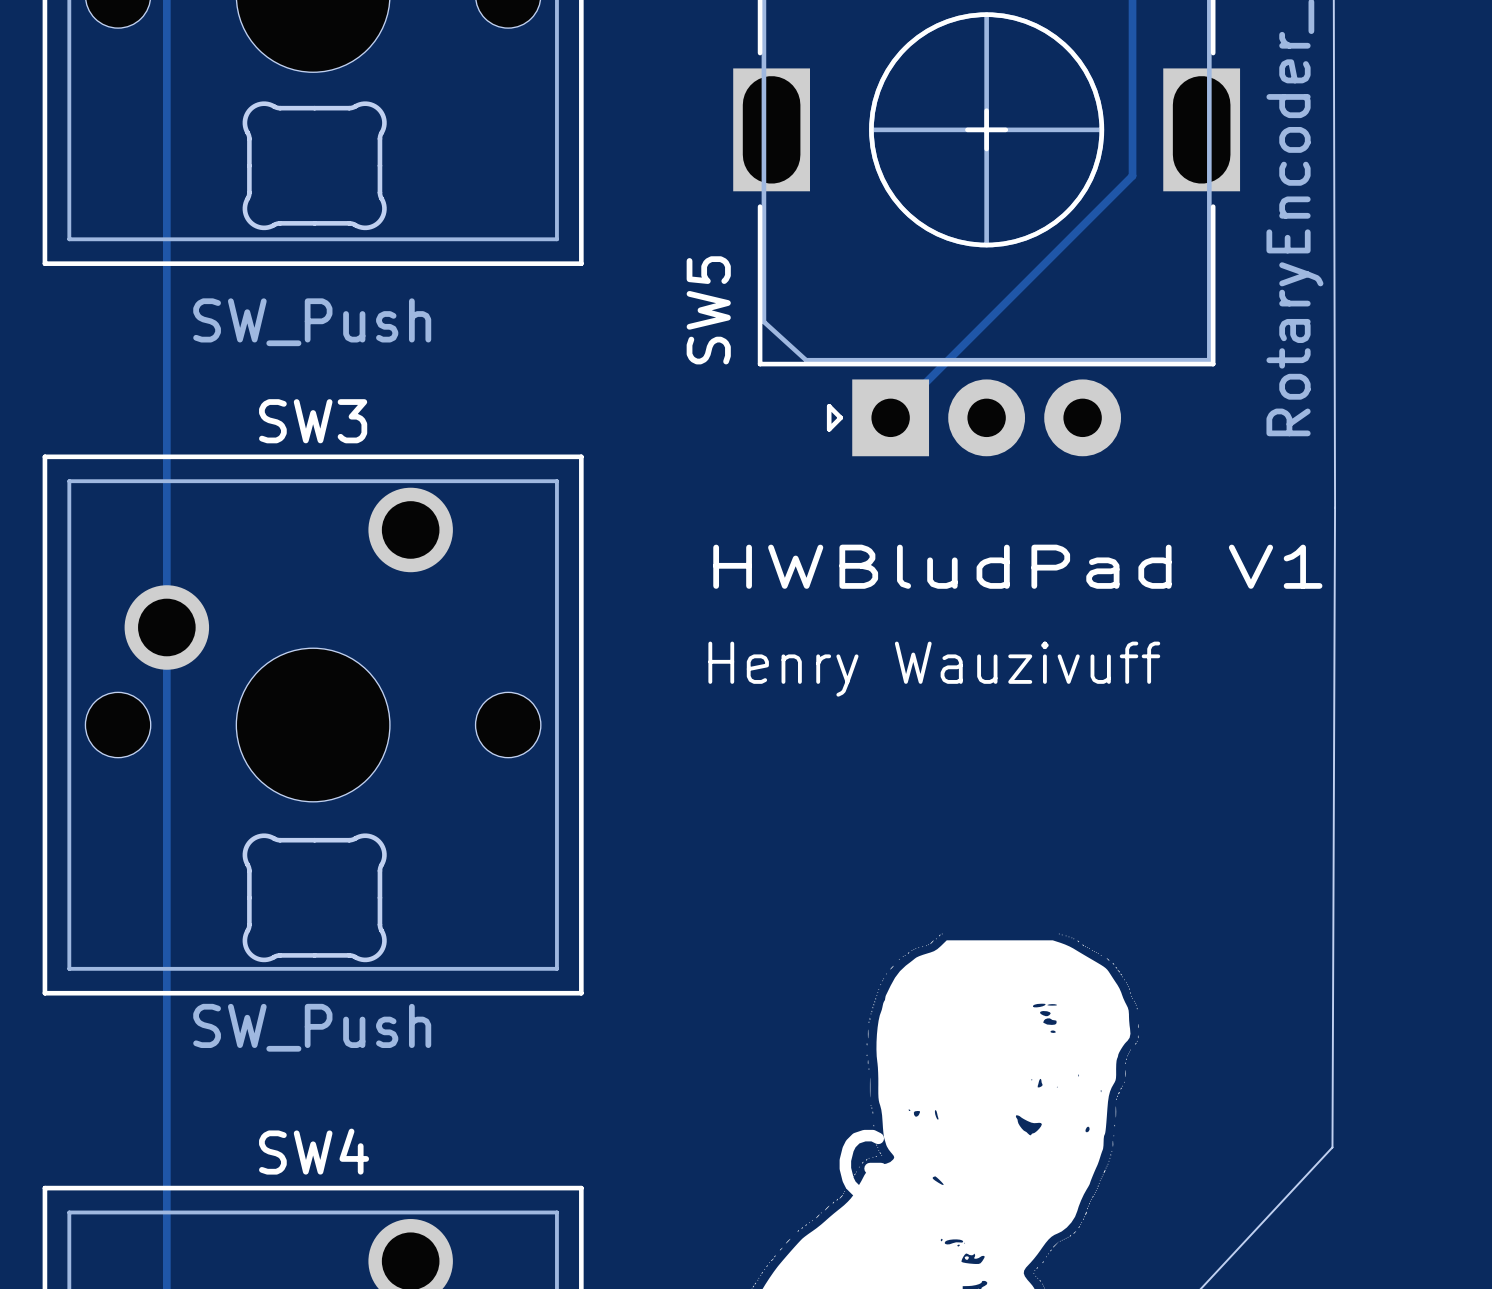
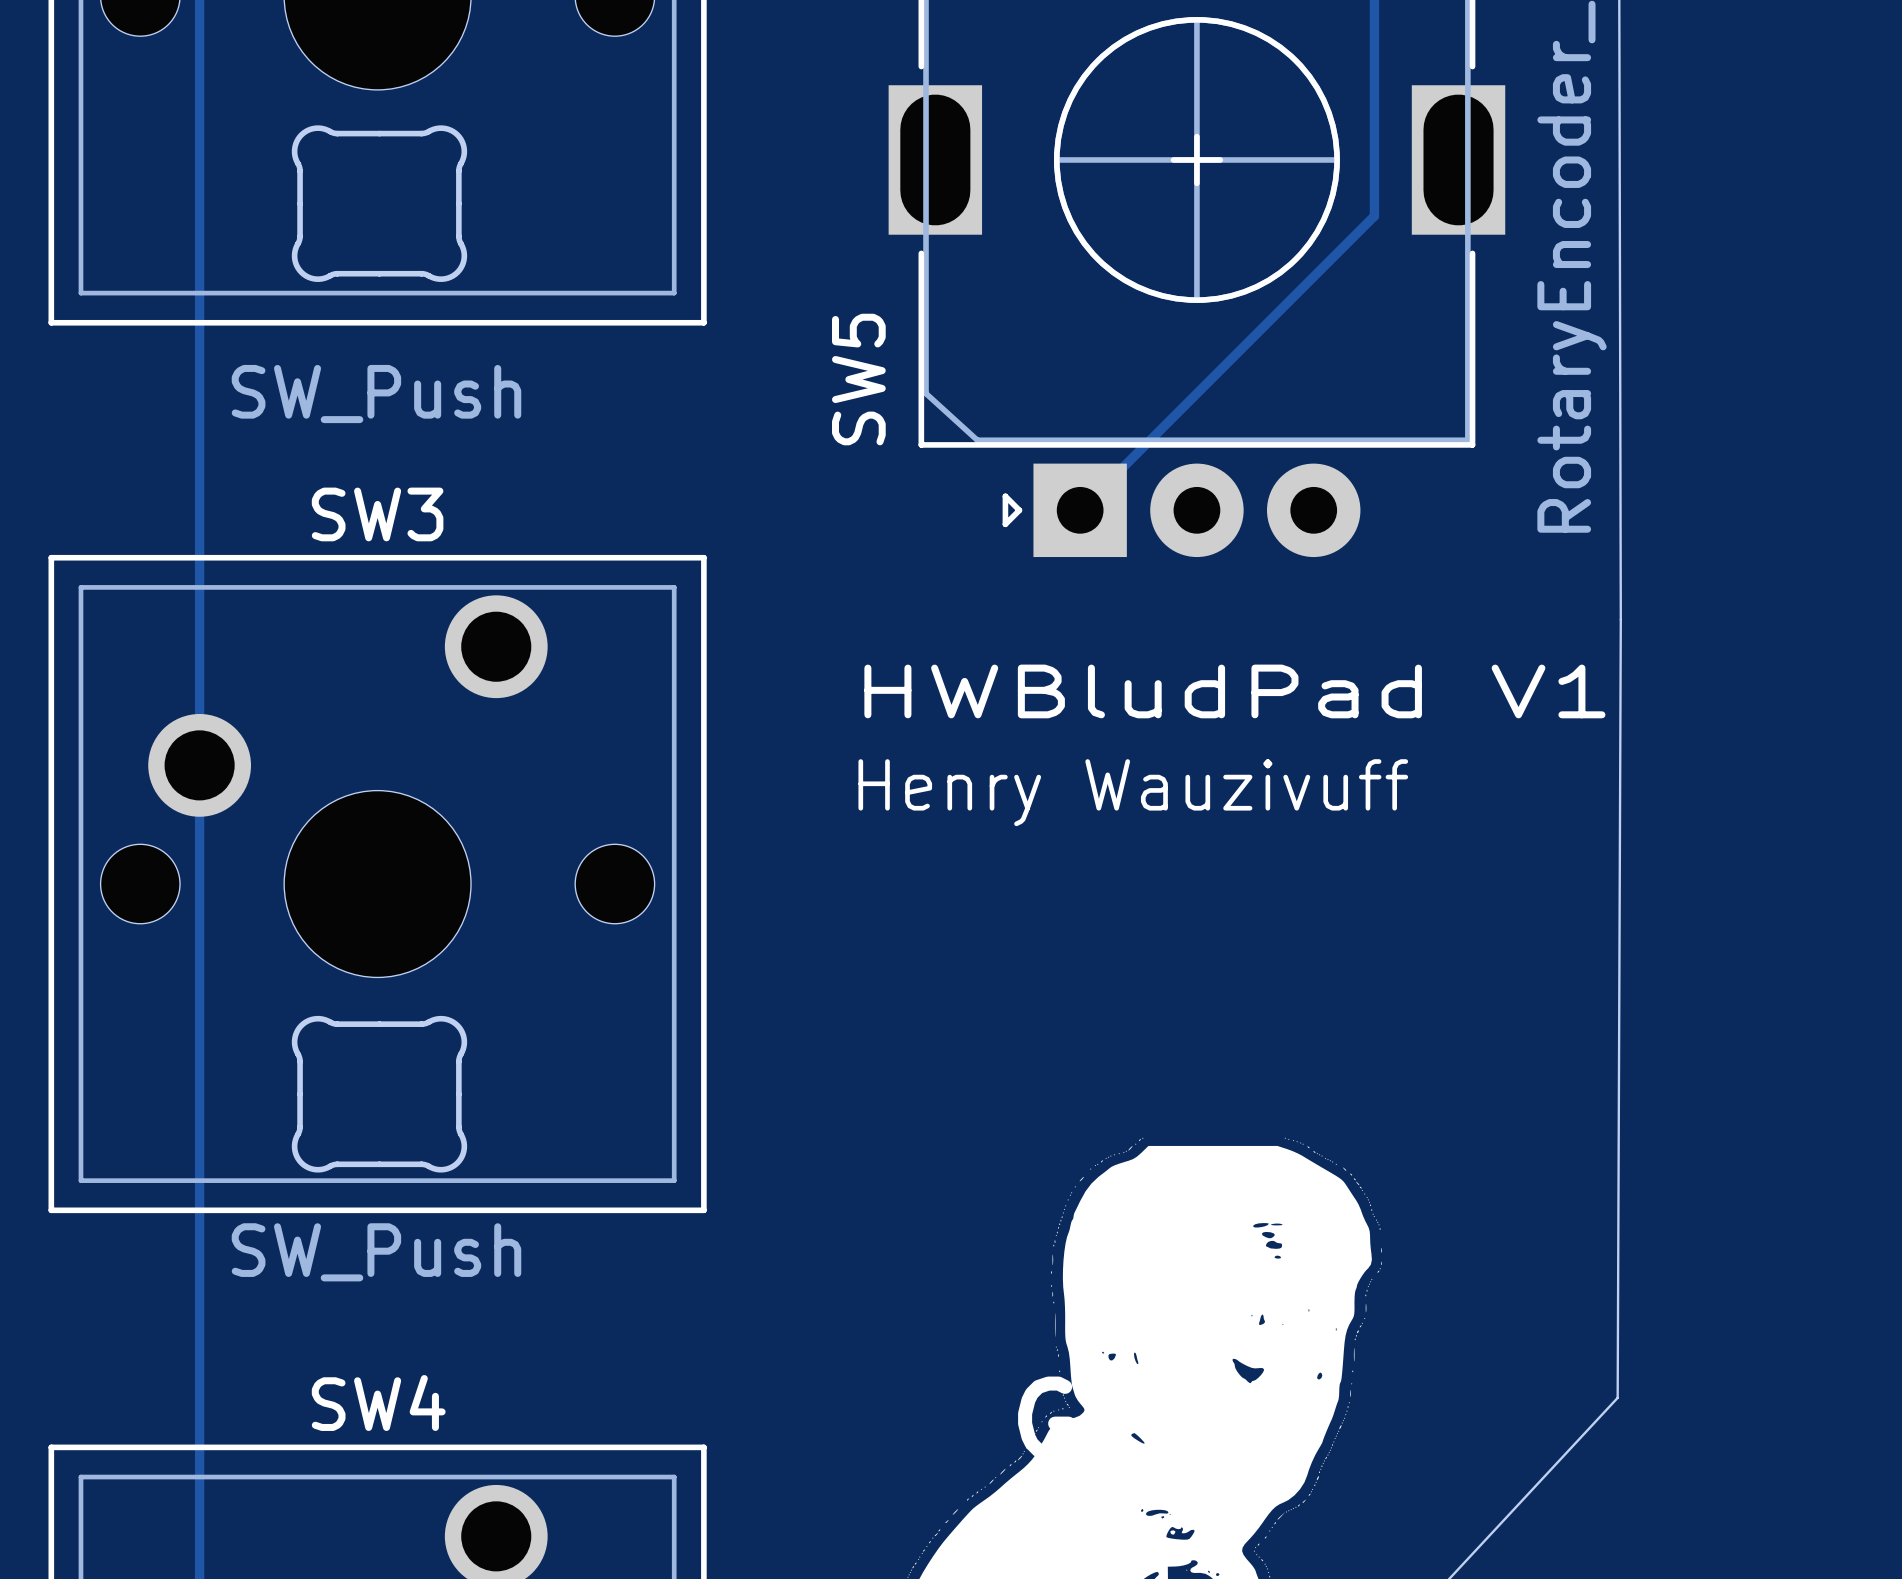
text position: Henry Wauzivuff (934, 669) -> Henry Wauzivuff (1133, 792)

